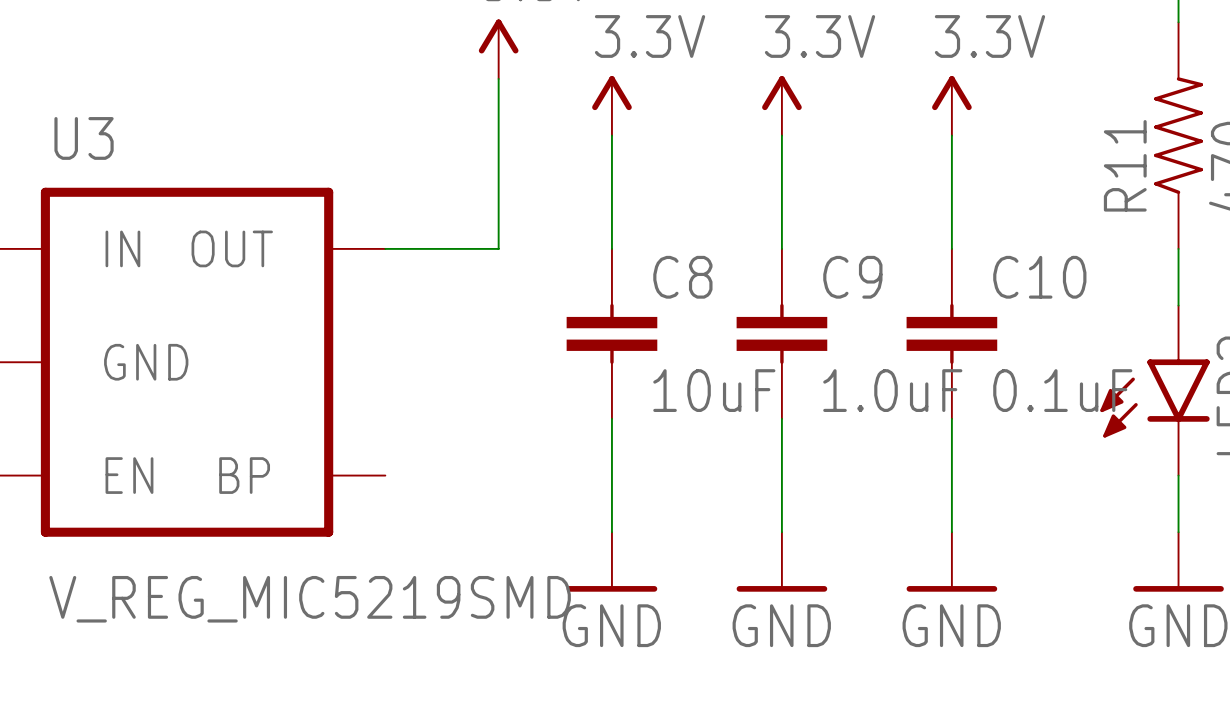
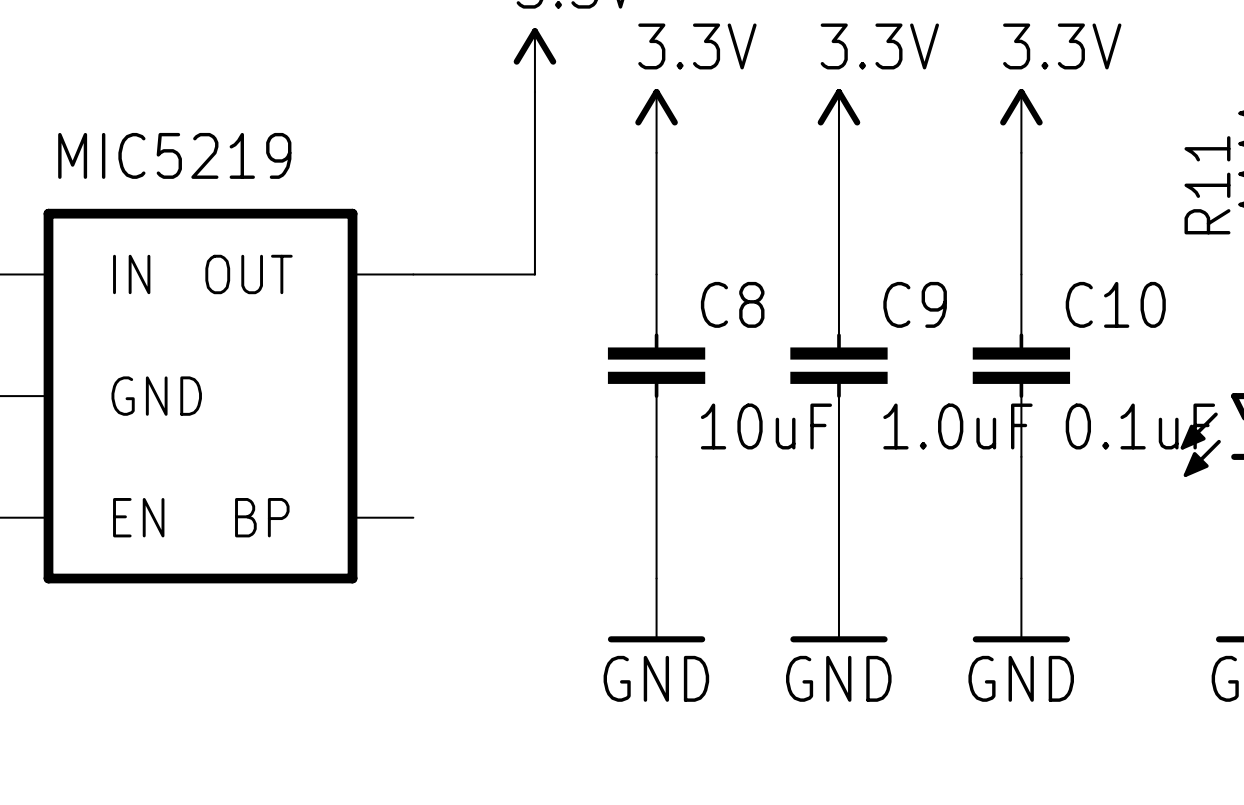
U3 name: U3 (84, 138) -> MIC5219 (174, 155)
U3 value: V_REG_MIC5219SMD (310, 599) -> none

